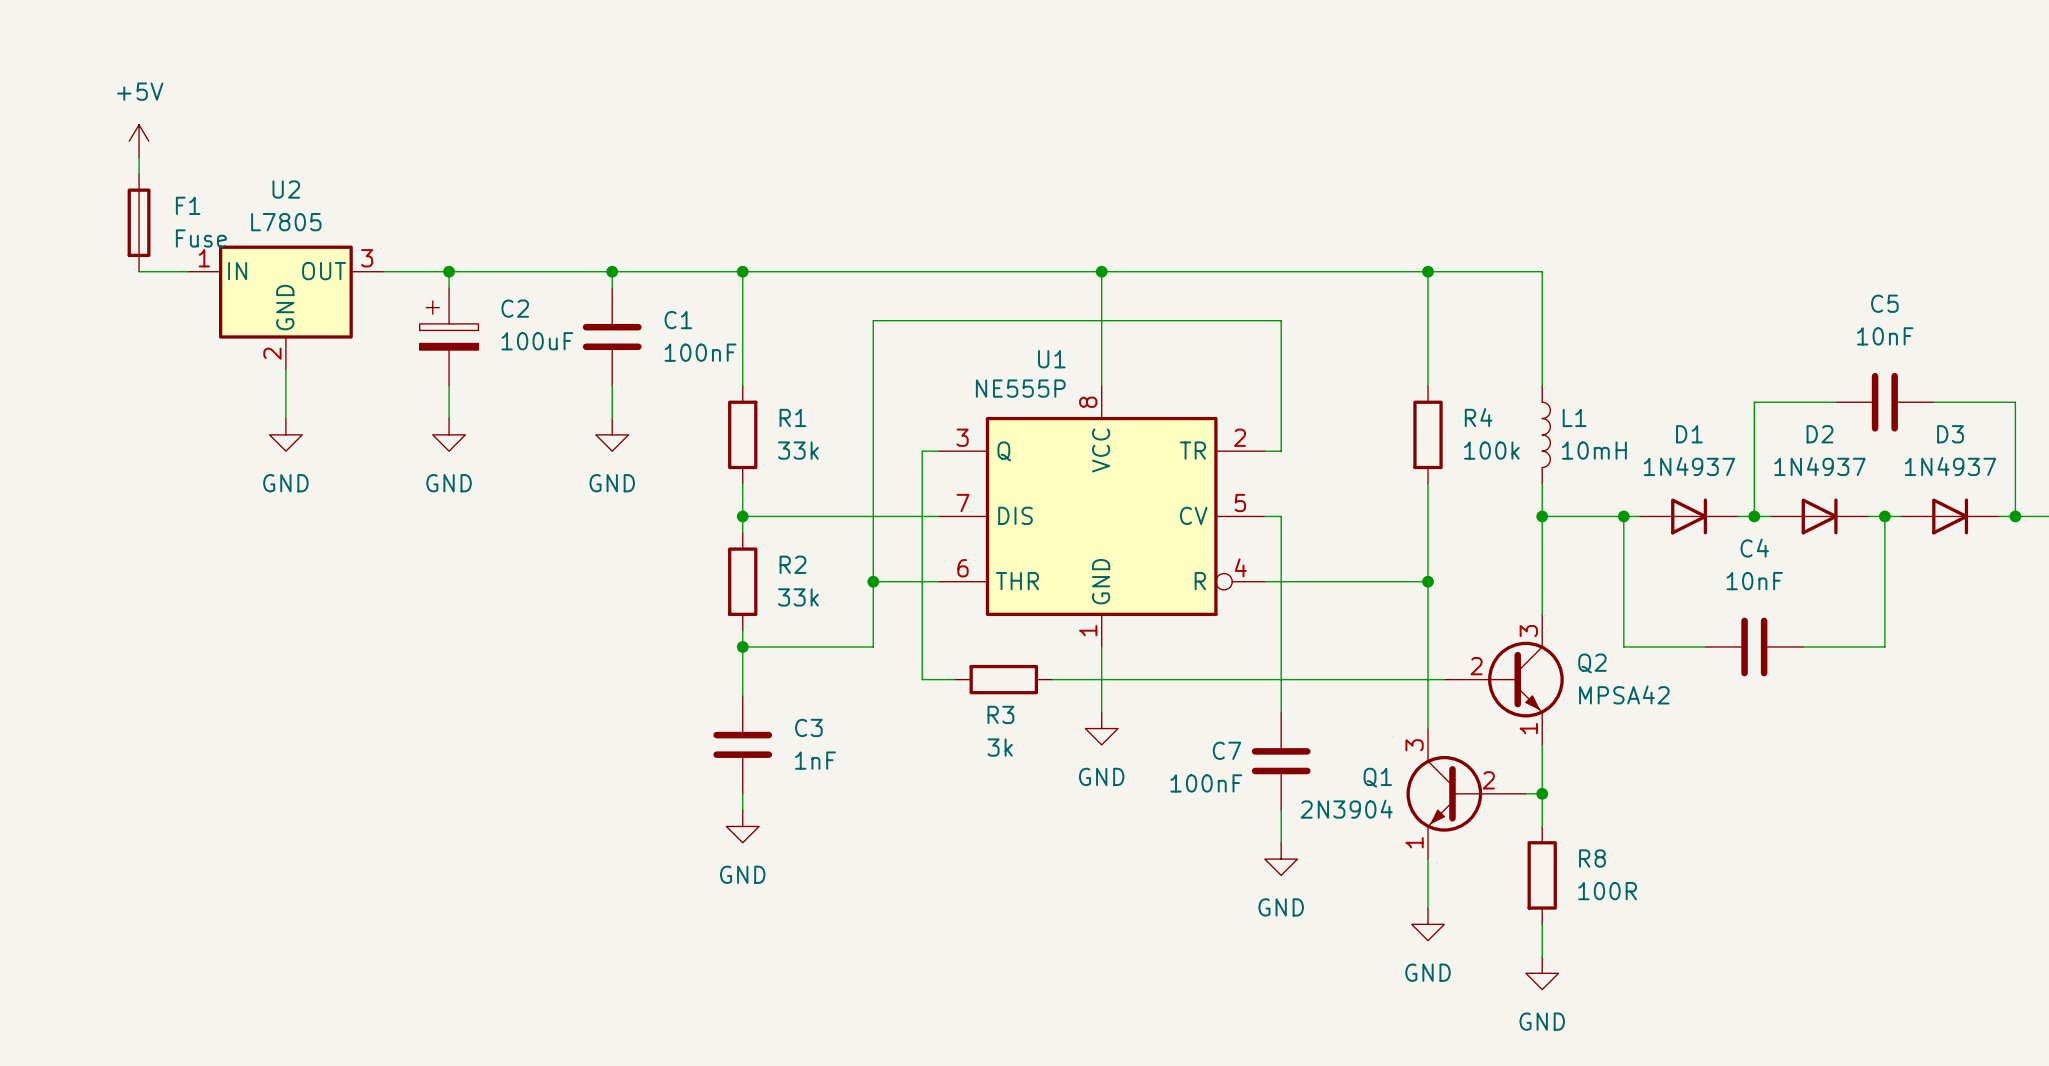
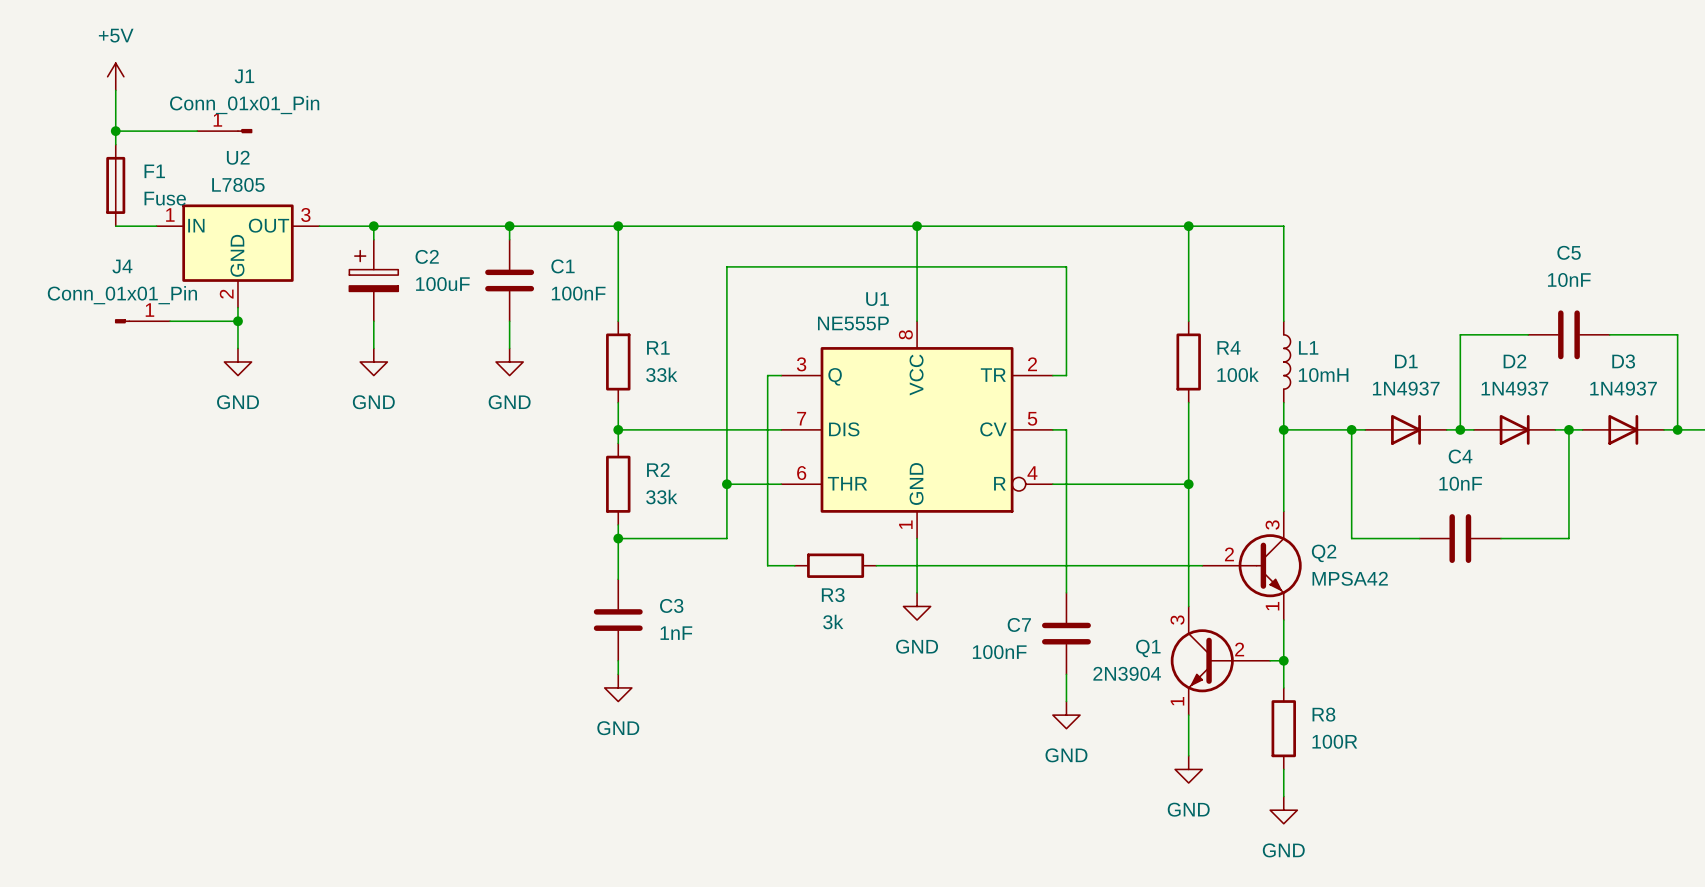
wire: none -> (115, 90) (115, 131) (197, 131)
power symbol position: +5V (139, 141) -> +5V (115, 76)
junction: none -> (115, 131)
J1: none -> Conn_01x01_Pin (224, 131)
J4: none -> Conn_01x01_Pin (142, 321)
wire: none -> (170, 321) (237, 321)
junction: none -> (237, 321)

